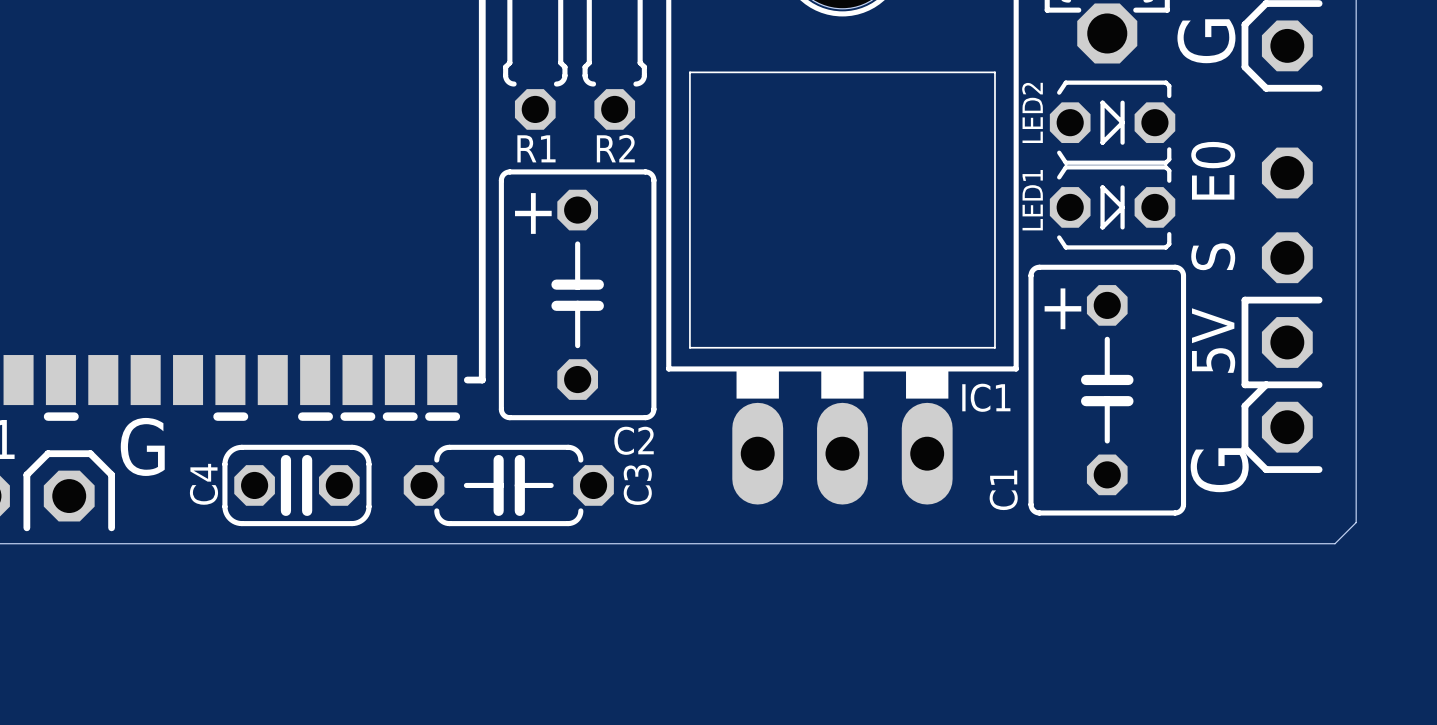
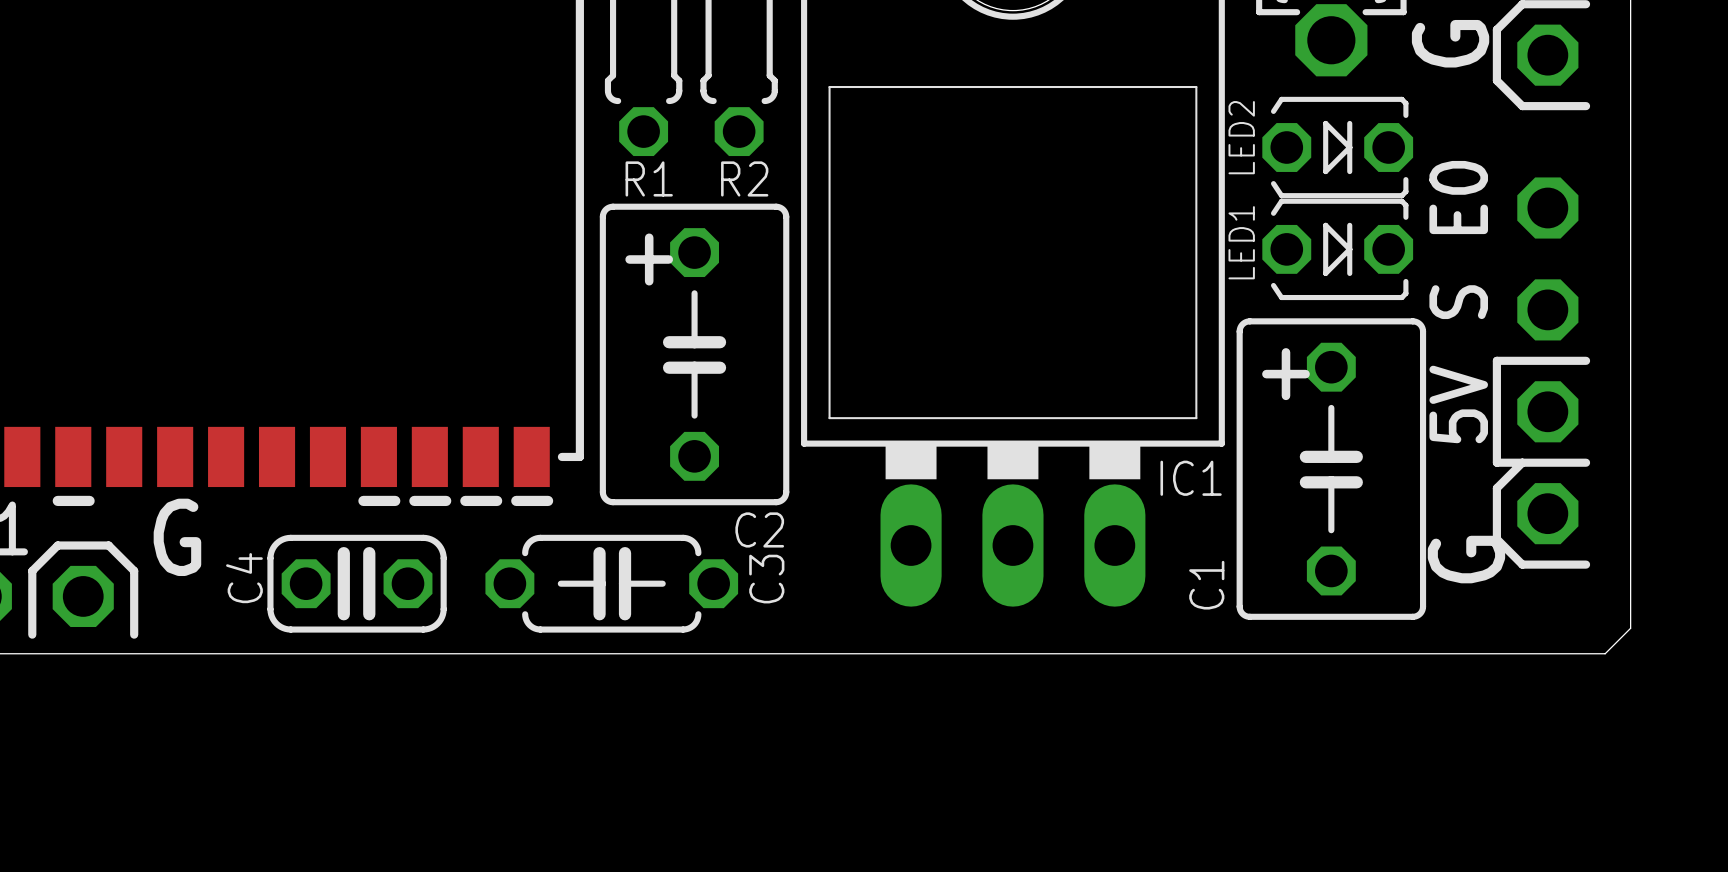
line: (217, 416) (244, 416) -> none

